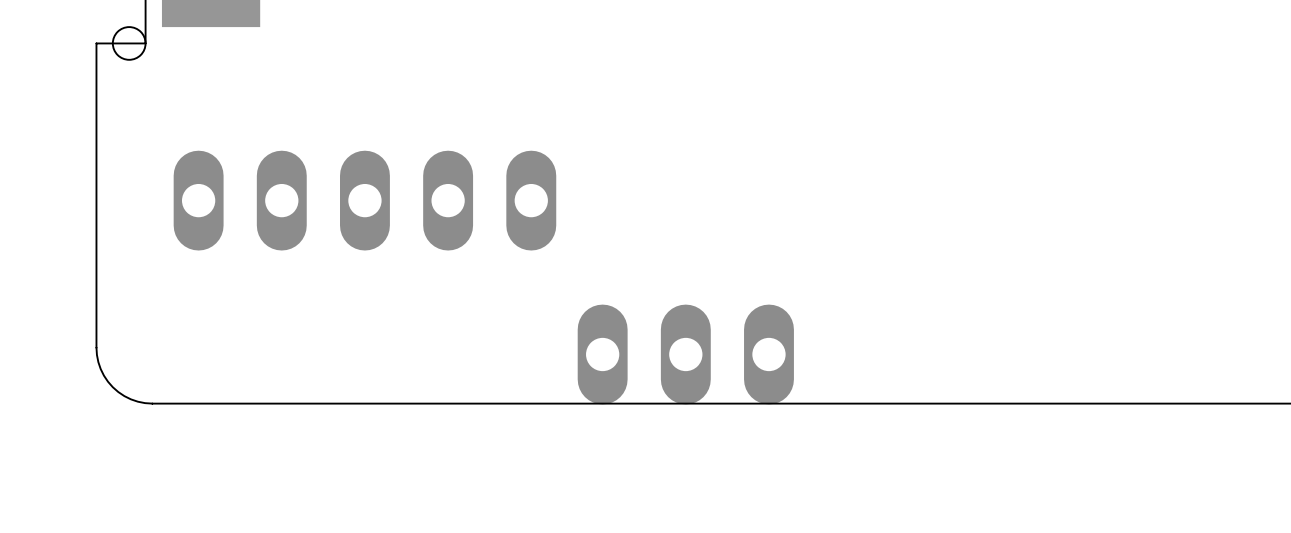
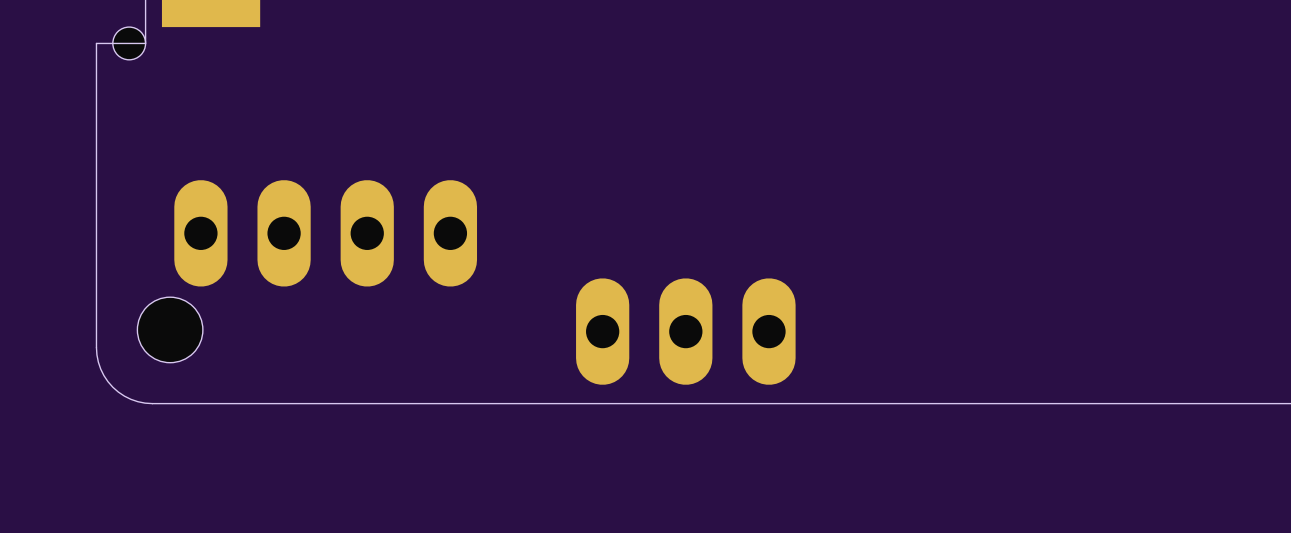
part: (364, 200) -> none
part: none -> (325, 233)
part footprint: [577, 304, 794, 405] -> [576, 278, 796, 385]
hole: none -> (170, 329)

